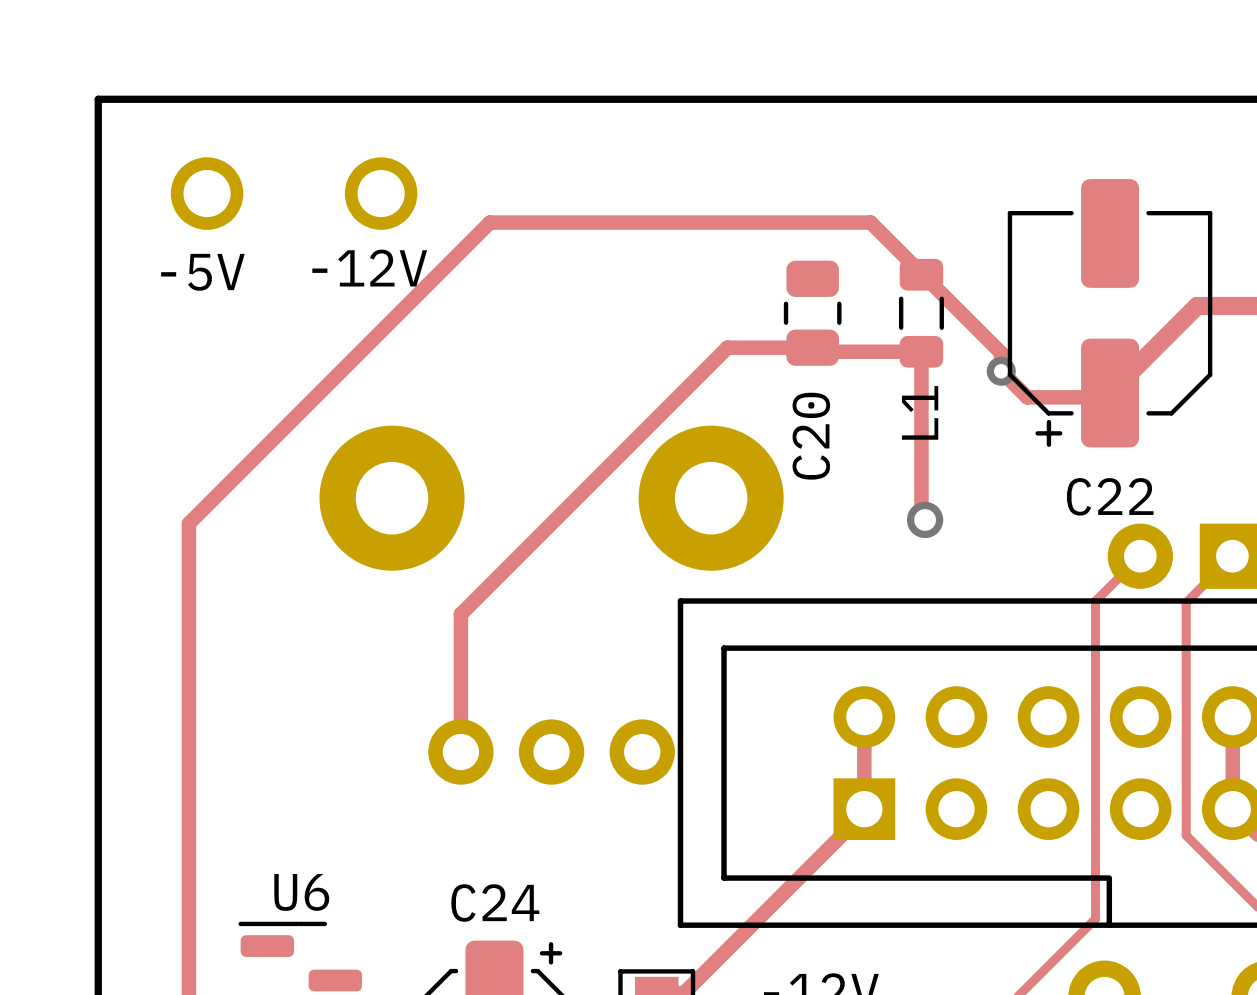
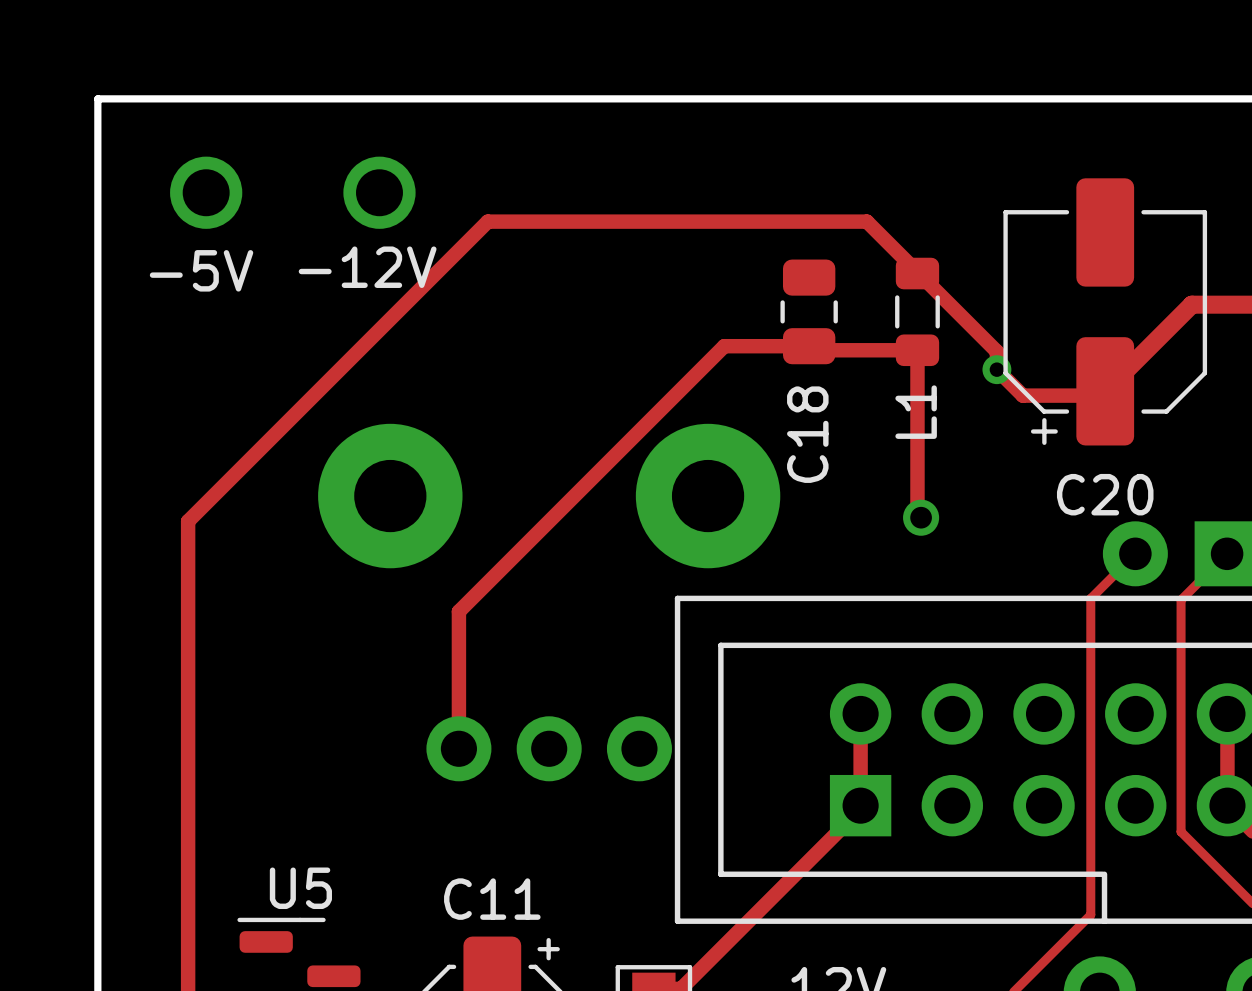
C20 name: C20 (811, 436) -> C18 (807, 434)
C22 name: C22 (1110, 496) -> C20 (1105, 494)
U6 name: U6 (301, 892) -> U5 (300, 888)
C24 name: C24 (495, 902) -> C11 (492, 899)

